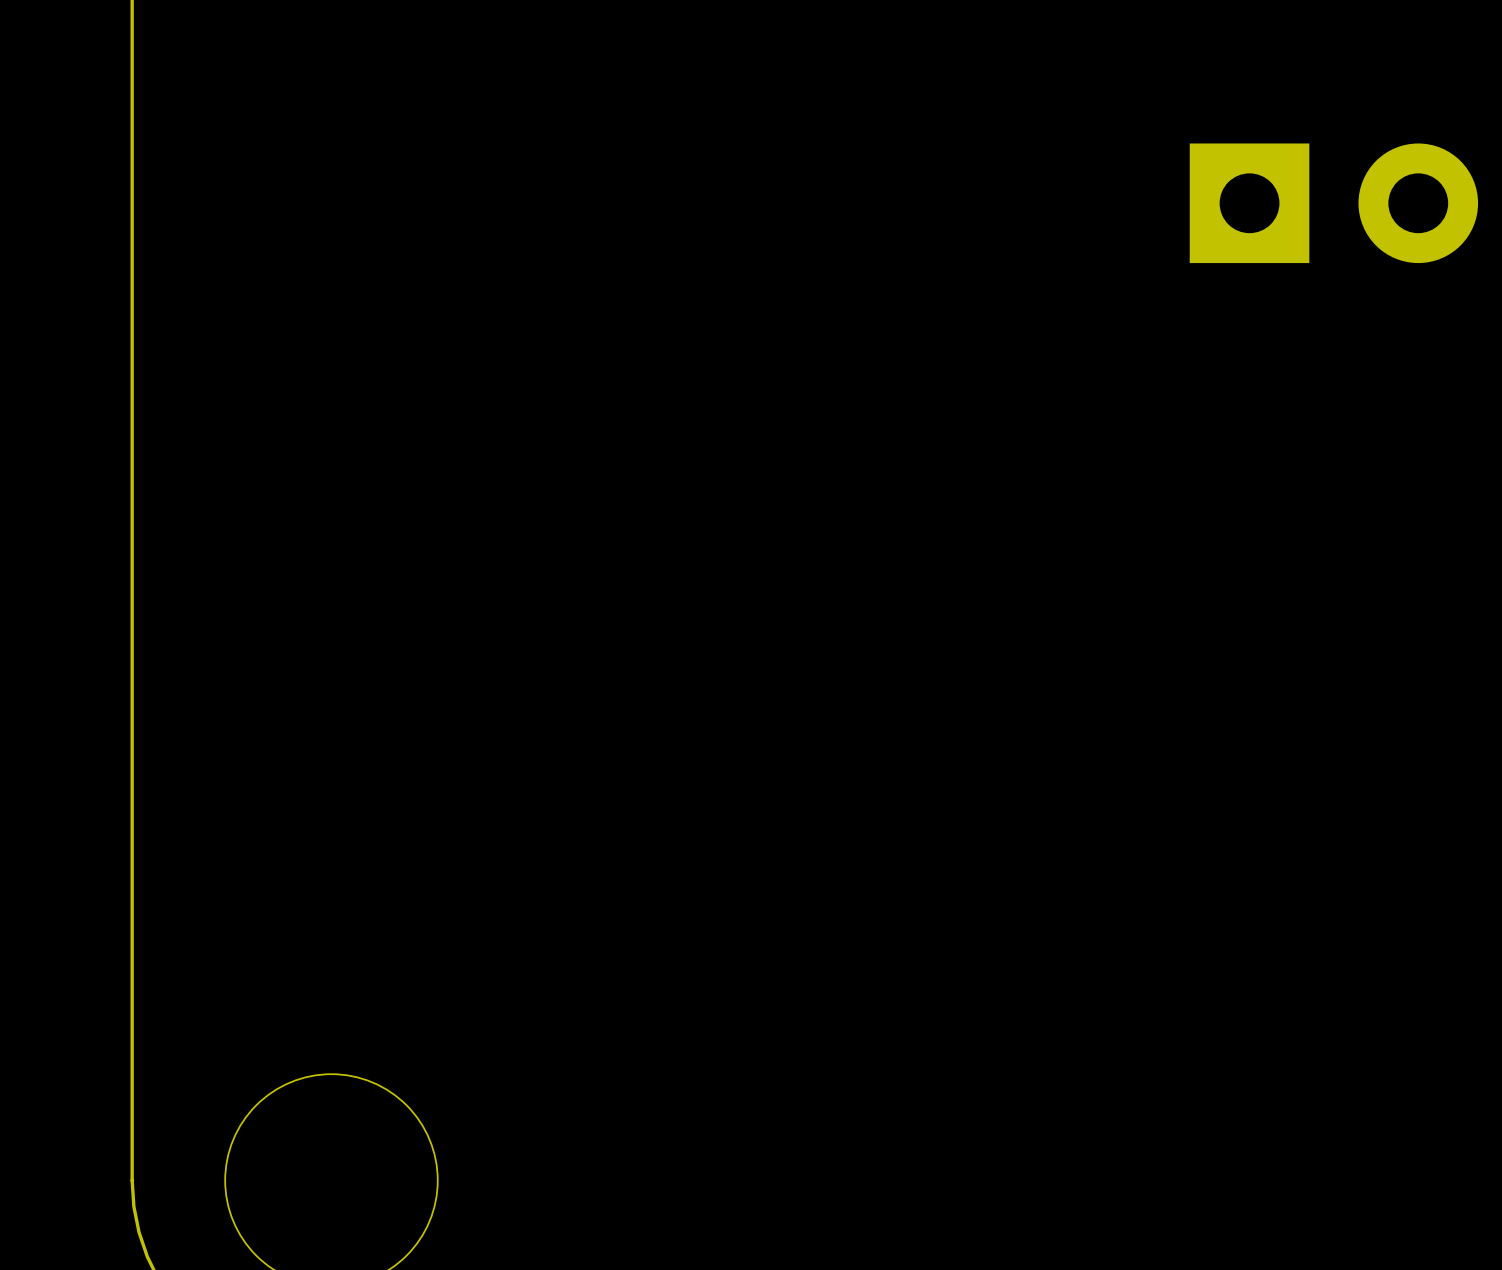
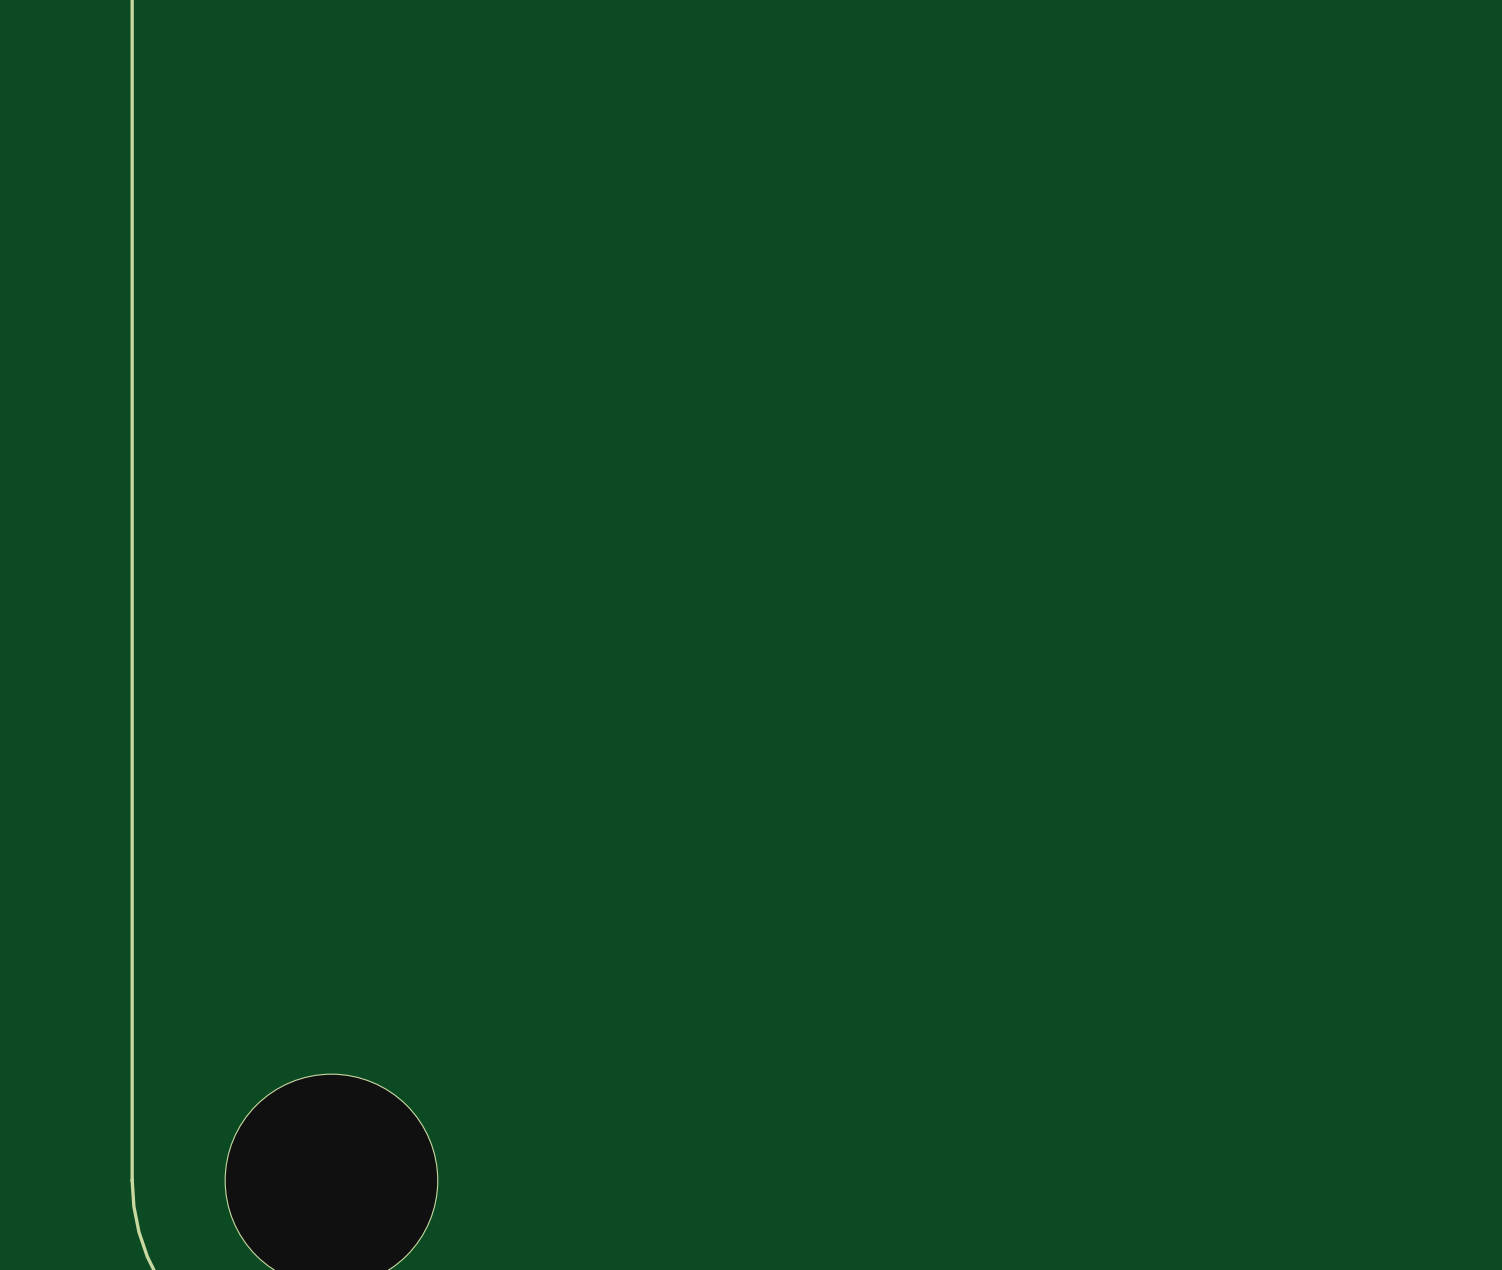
part: (1333, 203) -> none

